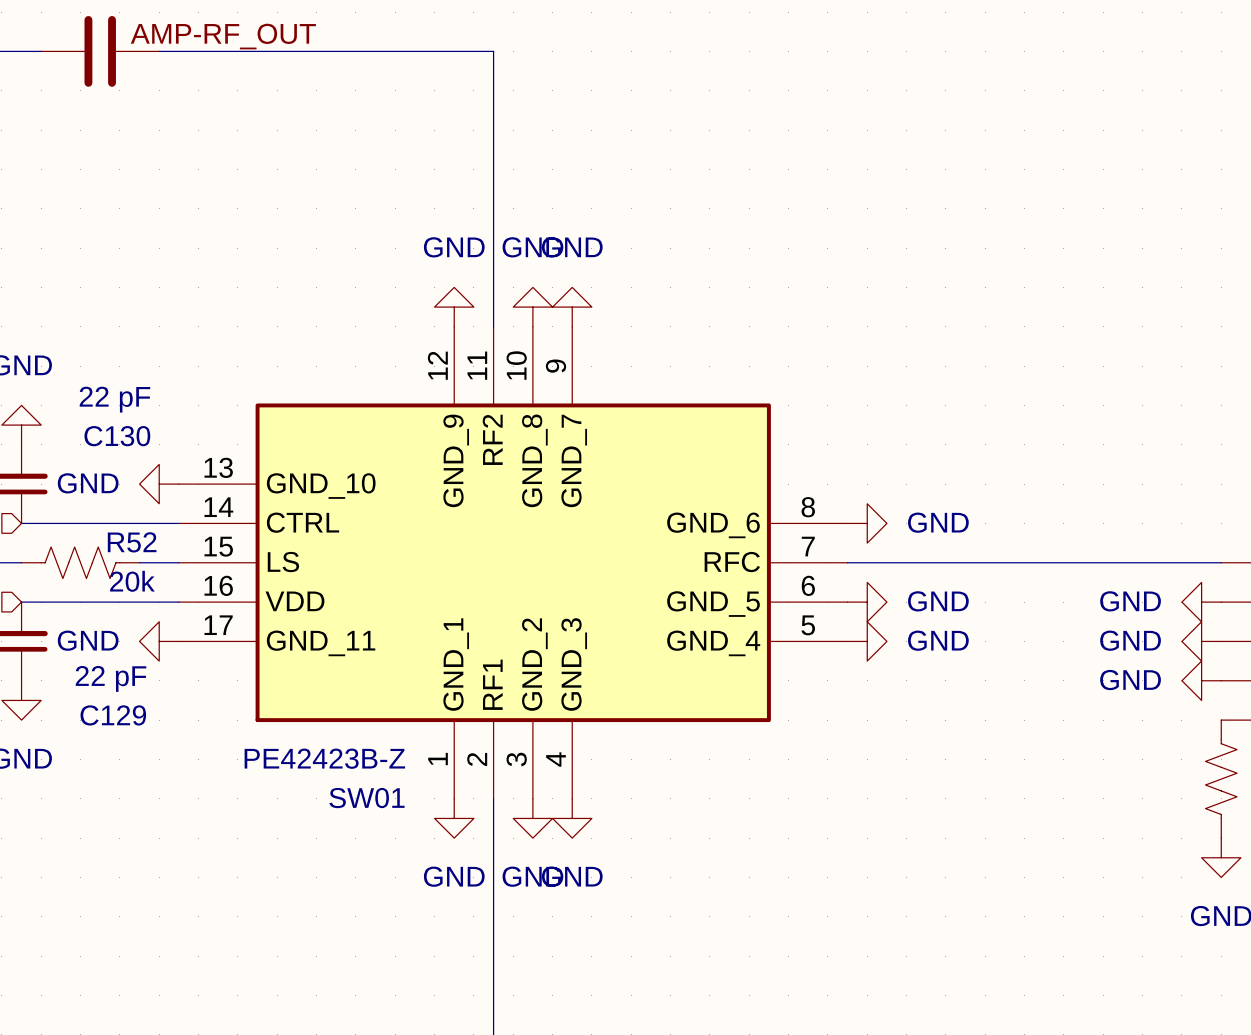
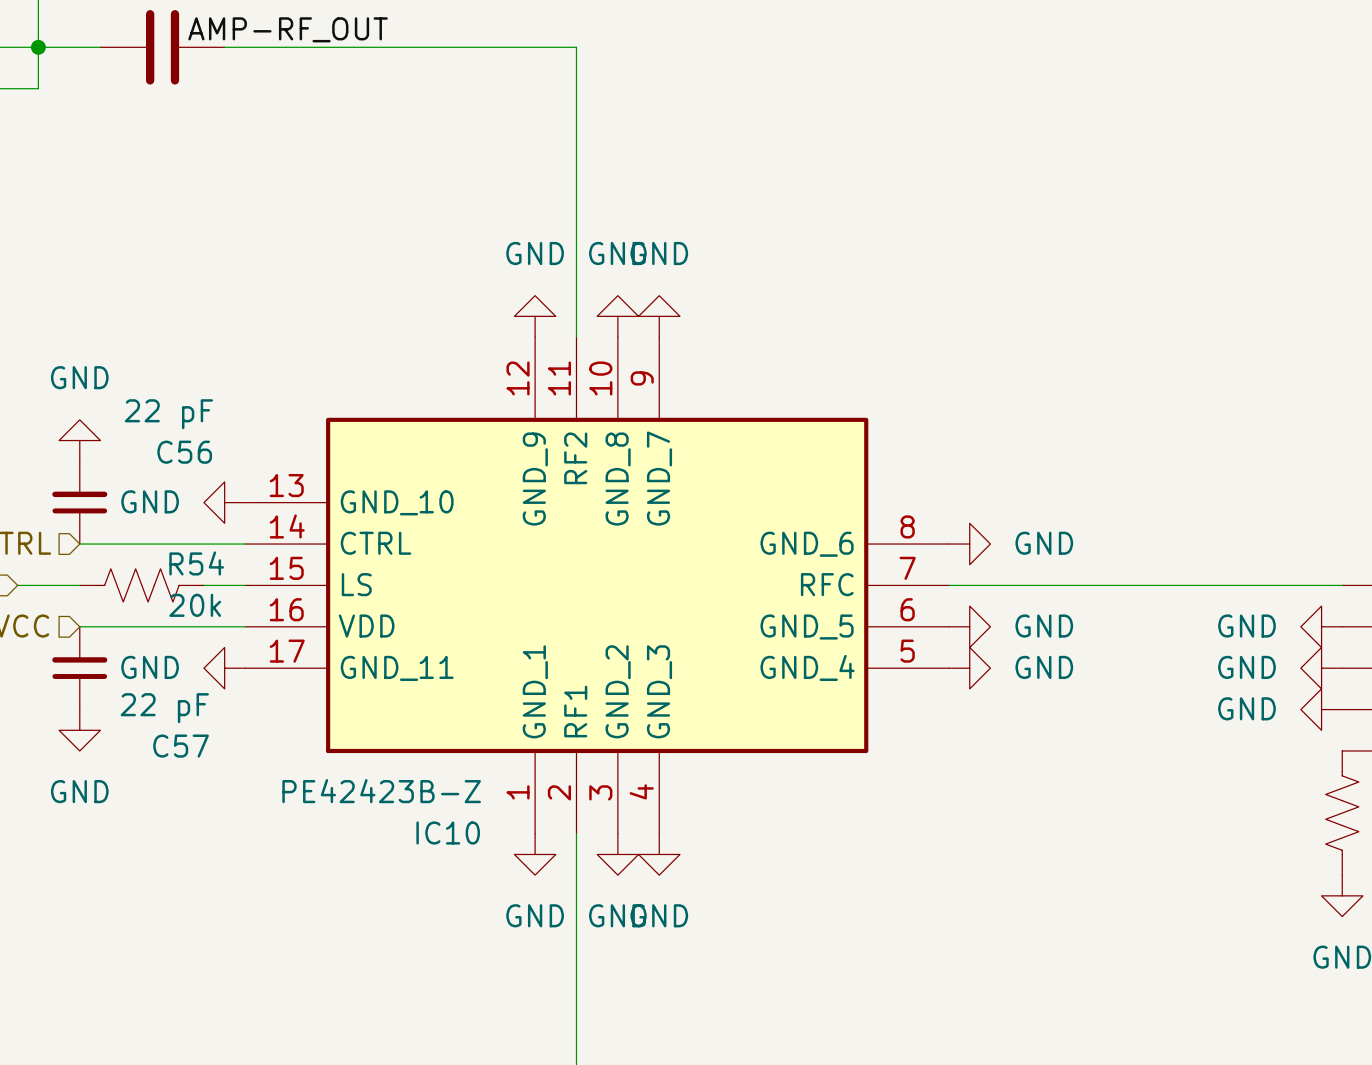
C130 name: C130 (117, 436) -> C56 (184, 452)
R52 name: R52 (132, 542) -> R54 (196, 563)
C129 name: C129 (113, 715) -> C57 (181, 746)
SW01 name: SW01 (366, 798) -> IC10 (448, 833)

